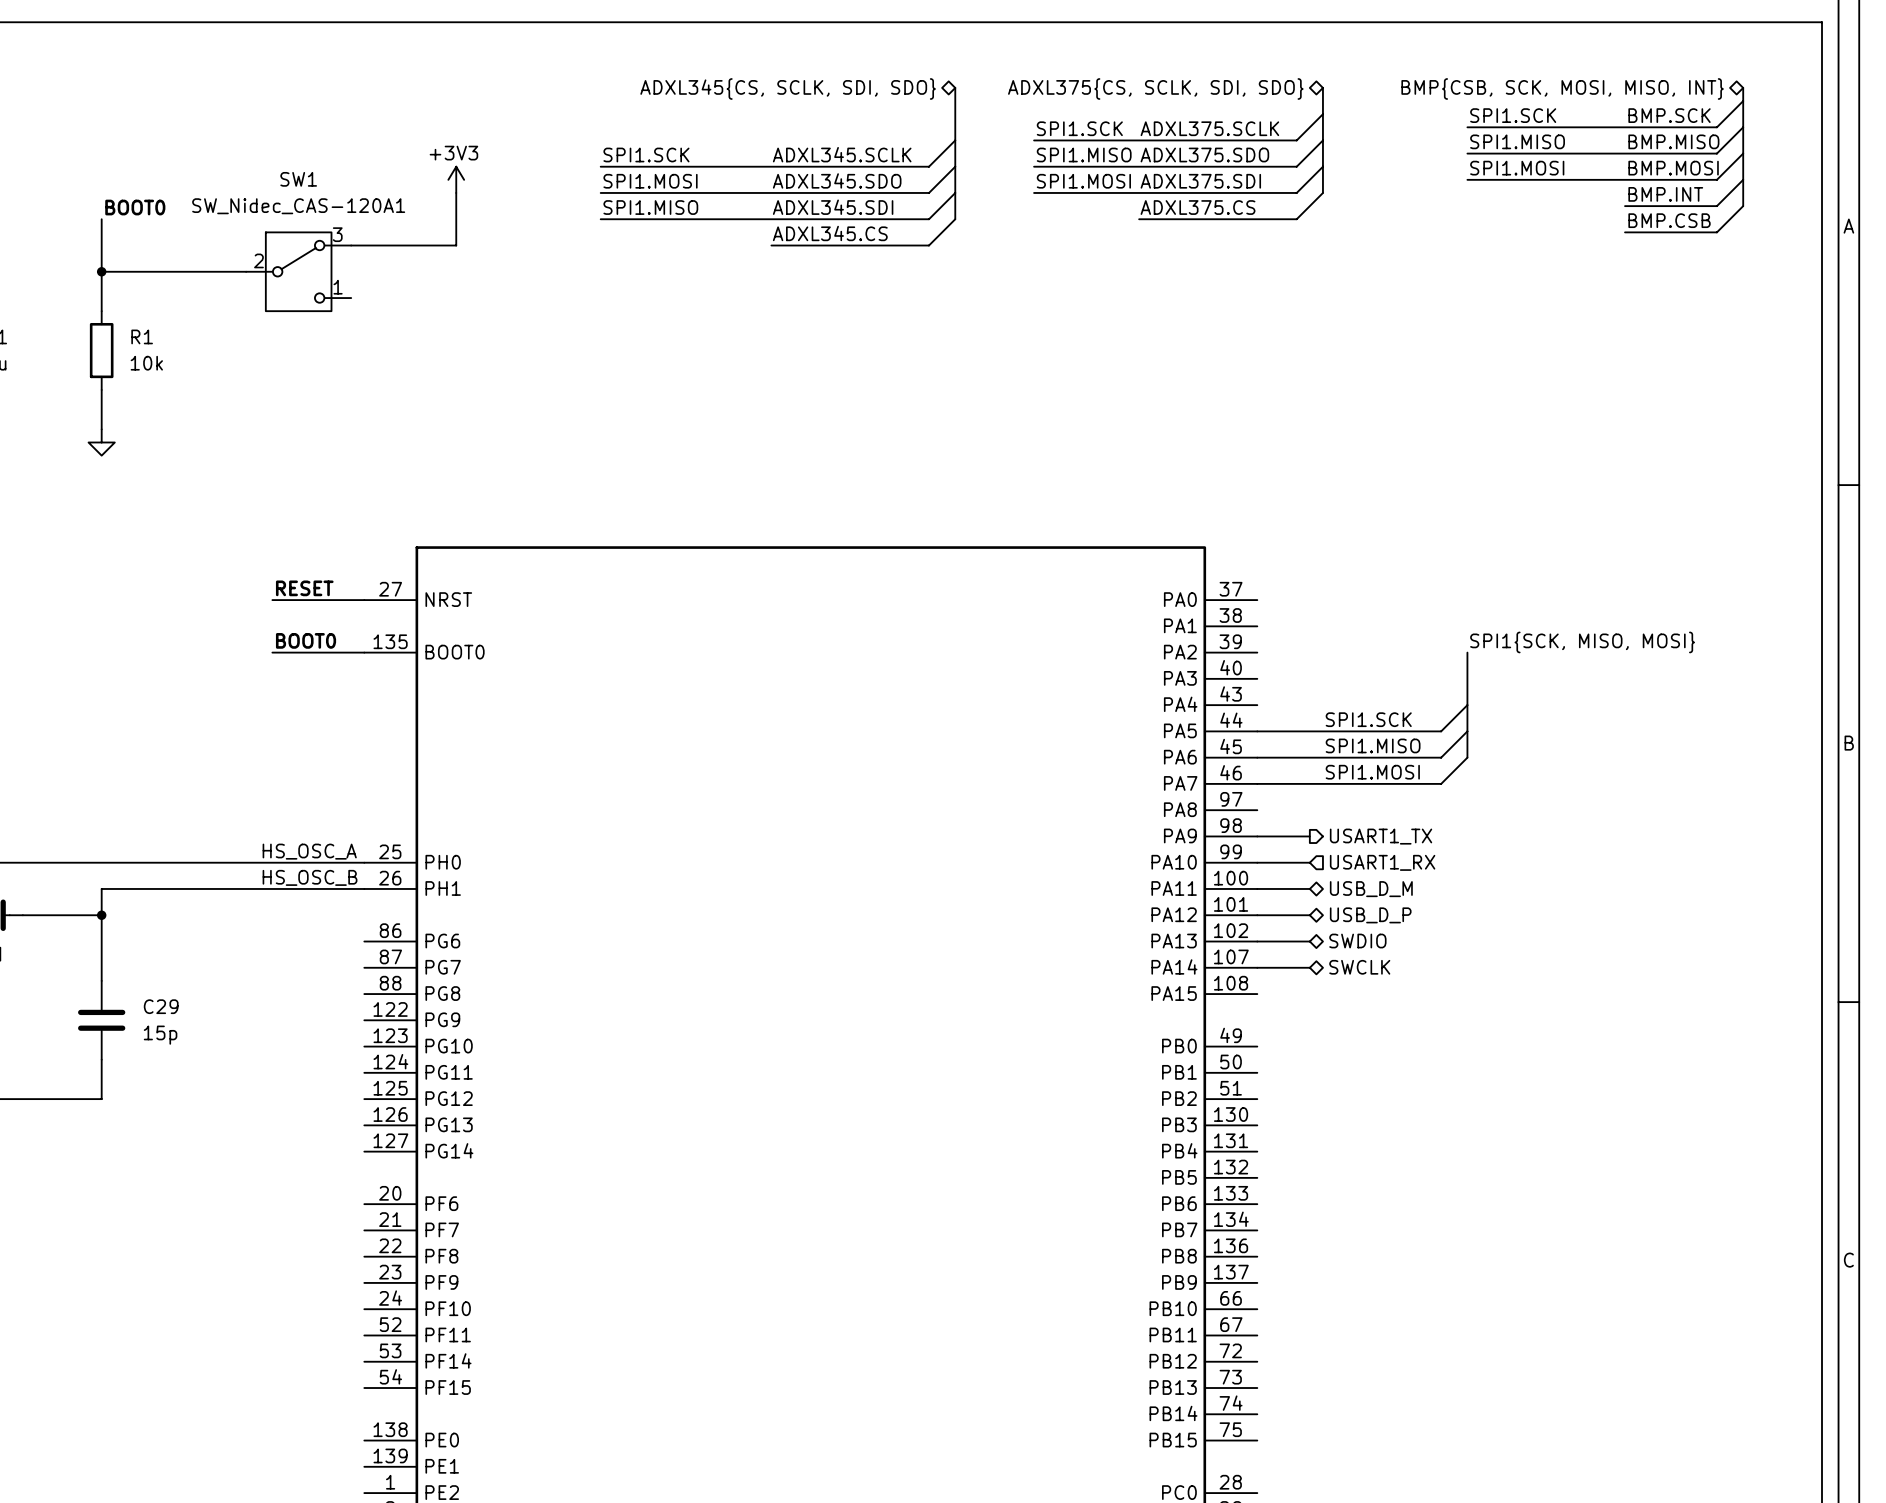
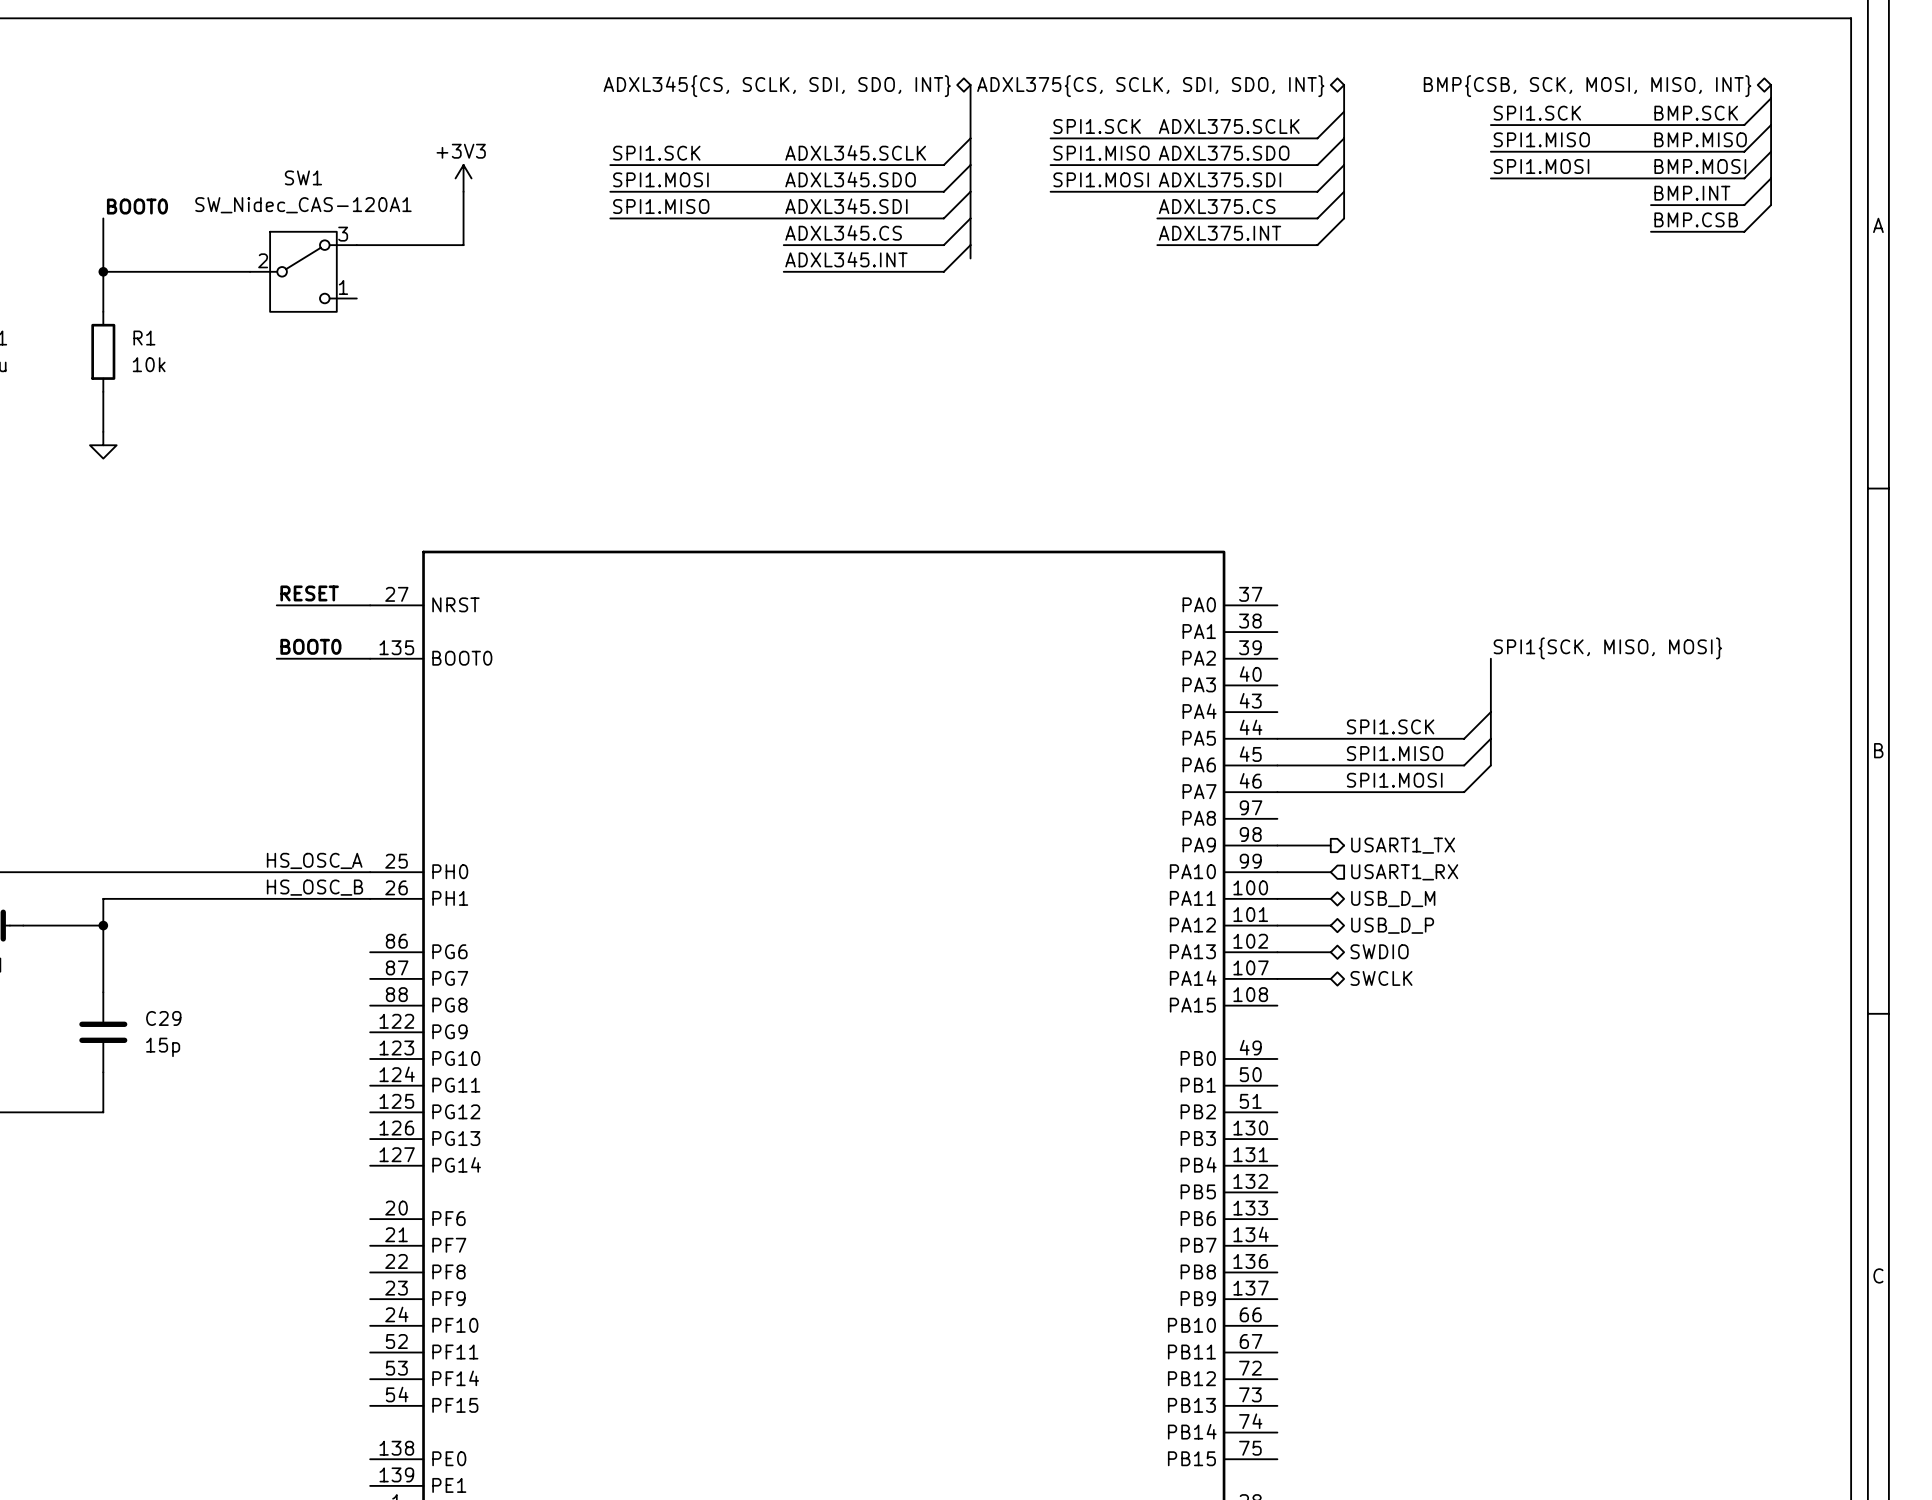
hierarchical label: ADXL345{CS, SCLK, SDI, SDO} (788, 88) -> ADXL345{CS, SCLK, SDI, SDO, INT} (777, 86)
hierarchical label: ADXL375{CS, SCLK, SDI, SDO} (1155, 88) -> ADXL375{CS, SCLK, SDI, SDO, INT} (1150, 86)
bus: none -> (1344, 191) (1344, 218)
bus: none -> (970, 218) (970, 258)
wire: none -> (1344, 218) (1317, 245) (1157, 245)
label: none -> ADXL375.INT (1220, 233)
wire: none -> (970, 245) (943, 271) (783, 271)
label: none -> ADXL345.INT (846, 259)

